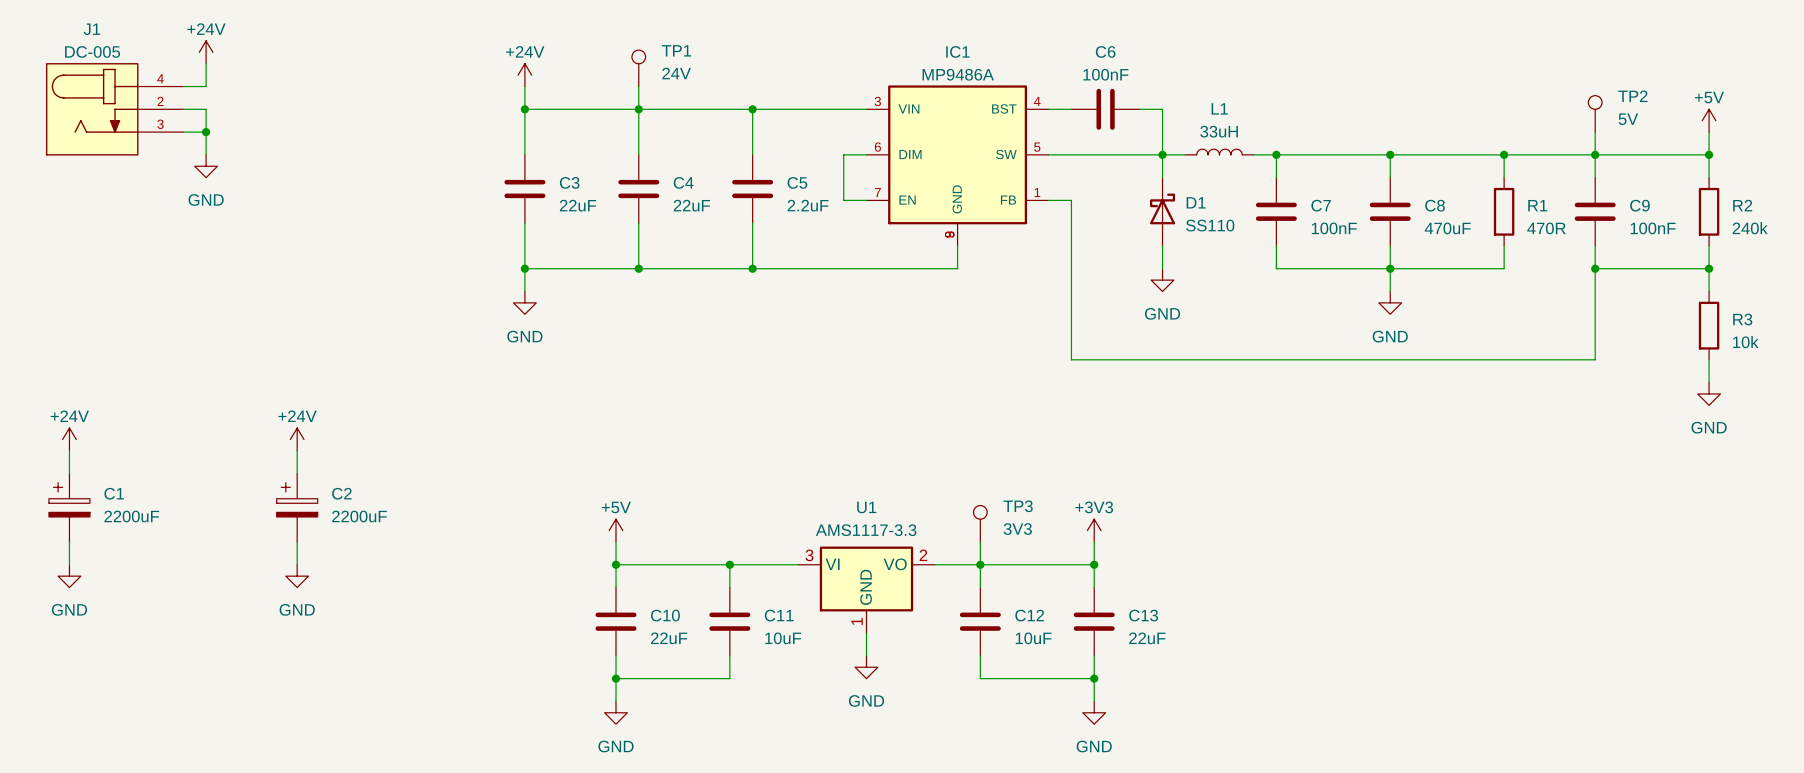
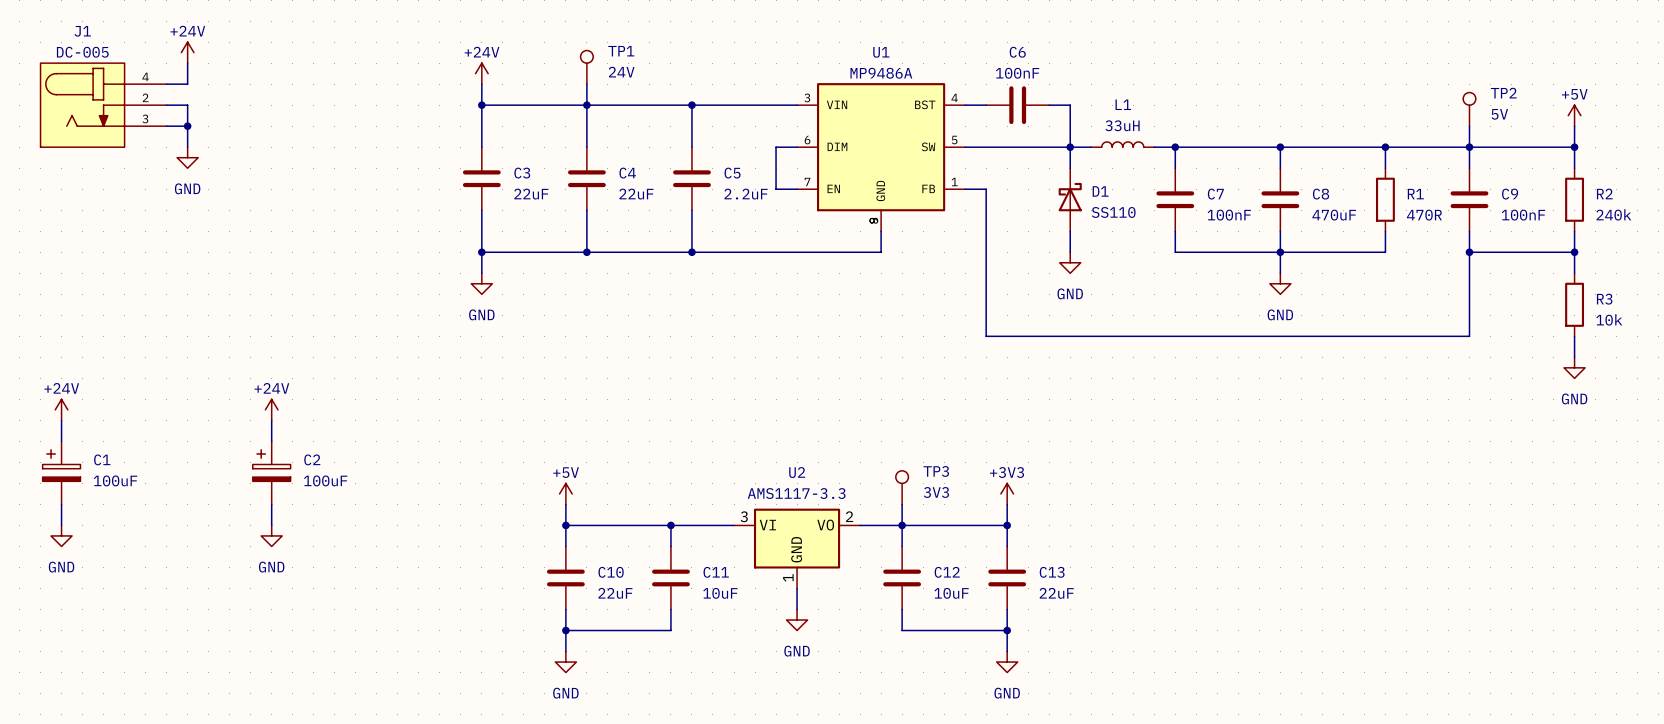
IC1 name: IC1 (957, 51) -> U1 (881, 52)
U1 name: U1 (866, 507) -> U2 (797, 472)
C1 value: 2200uF (131, 516) -> 100uF (115, 480)
C2 value: 2200uF (359, 516) -> 100uF (325, 480)

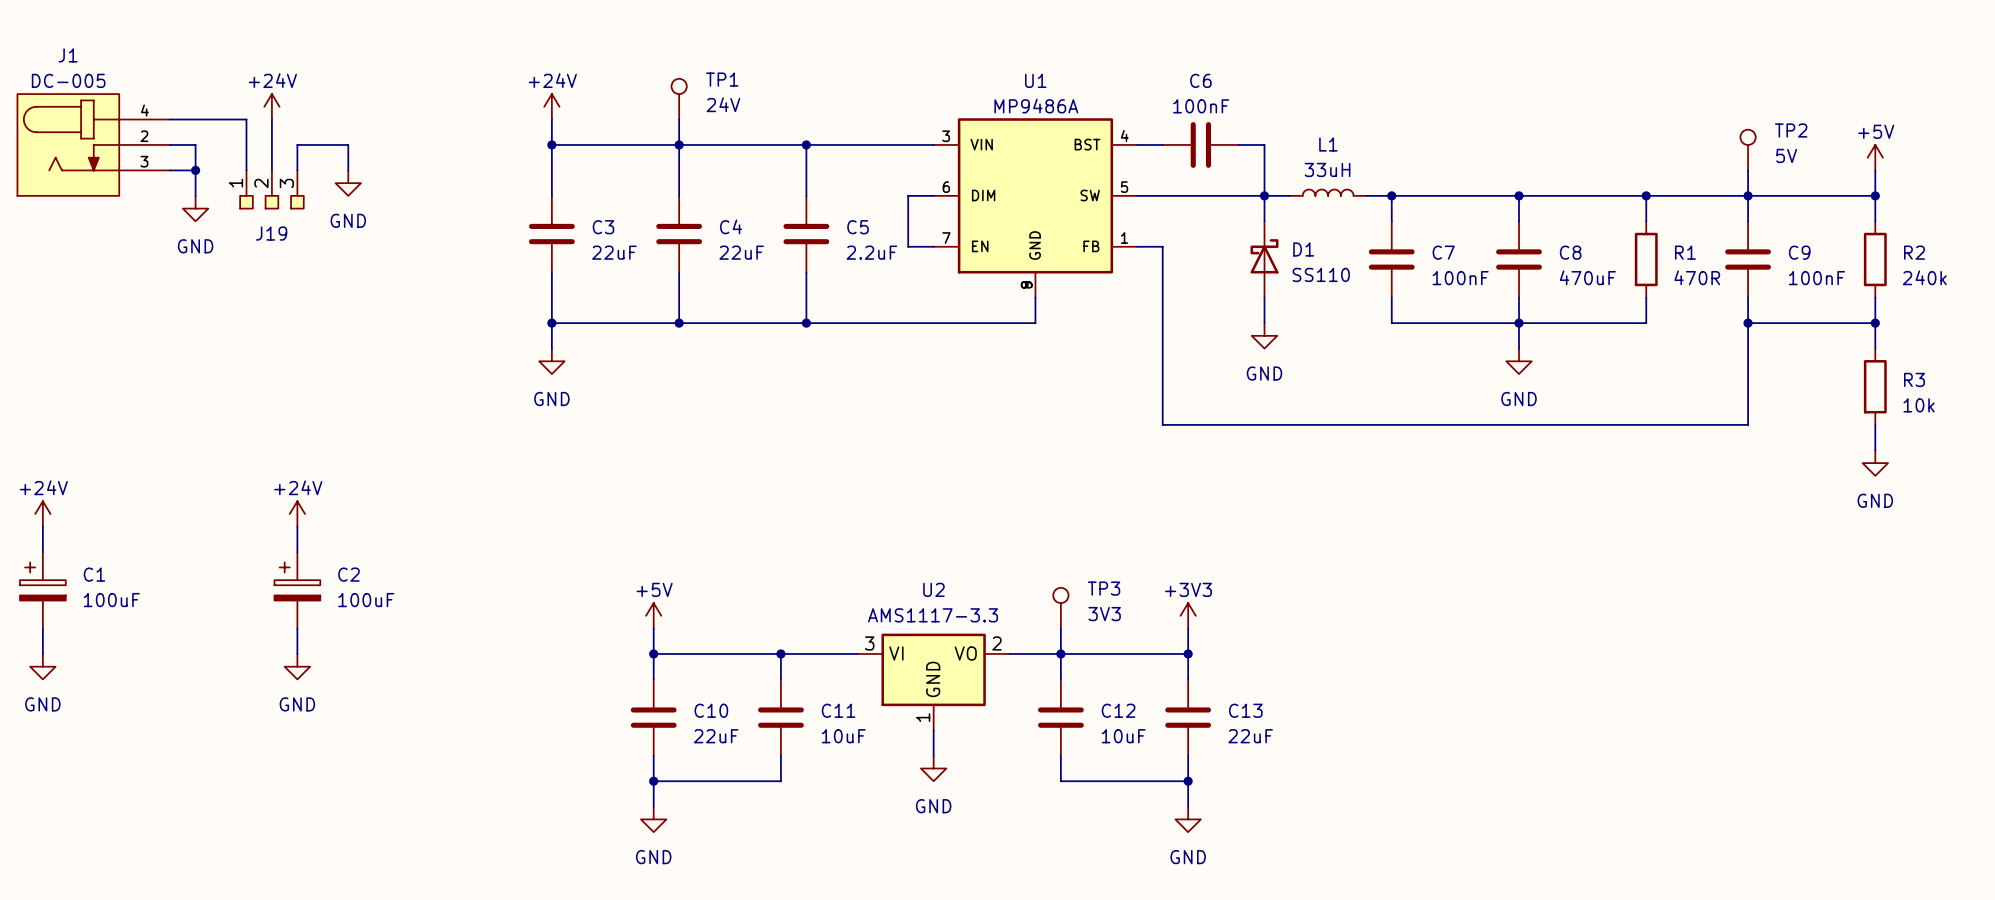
power symbol position: +24V (187, 52) -> +24V (271, 106)
wire: (187, 63) (187, 84) -> (246, 170) (246, 119) (195, 119)
wire: none -> (271, 119) (271, 170)
wire: none -> (297, 170) (297, 144) (348, 144) (348, 170)
power symbol: none -> GND (348, 183)
J19: none -> (271, 189)

